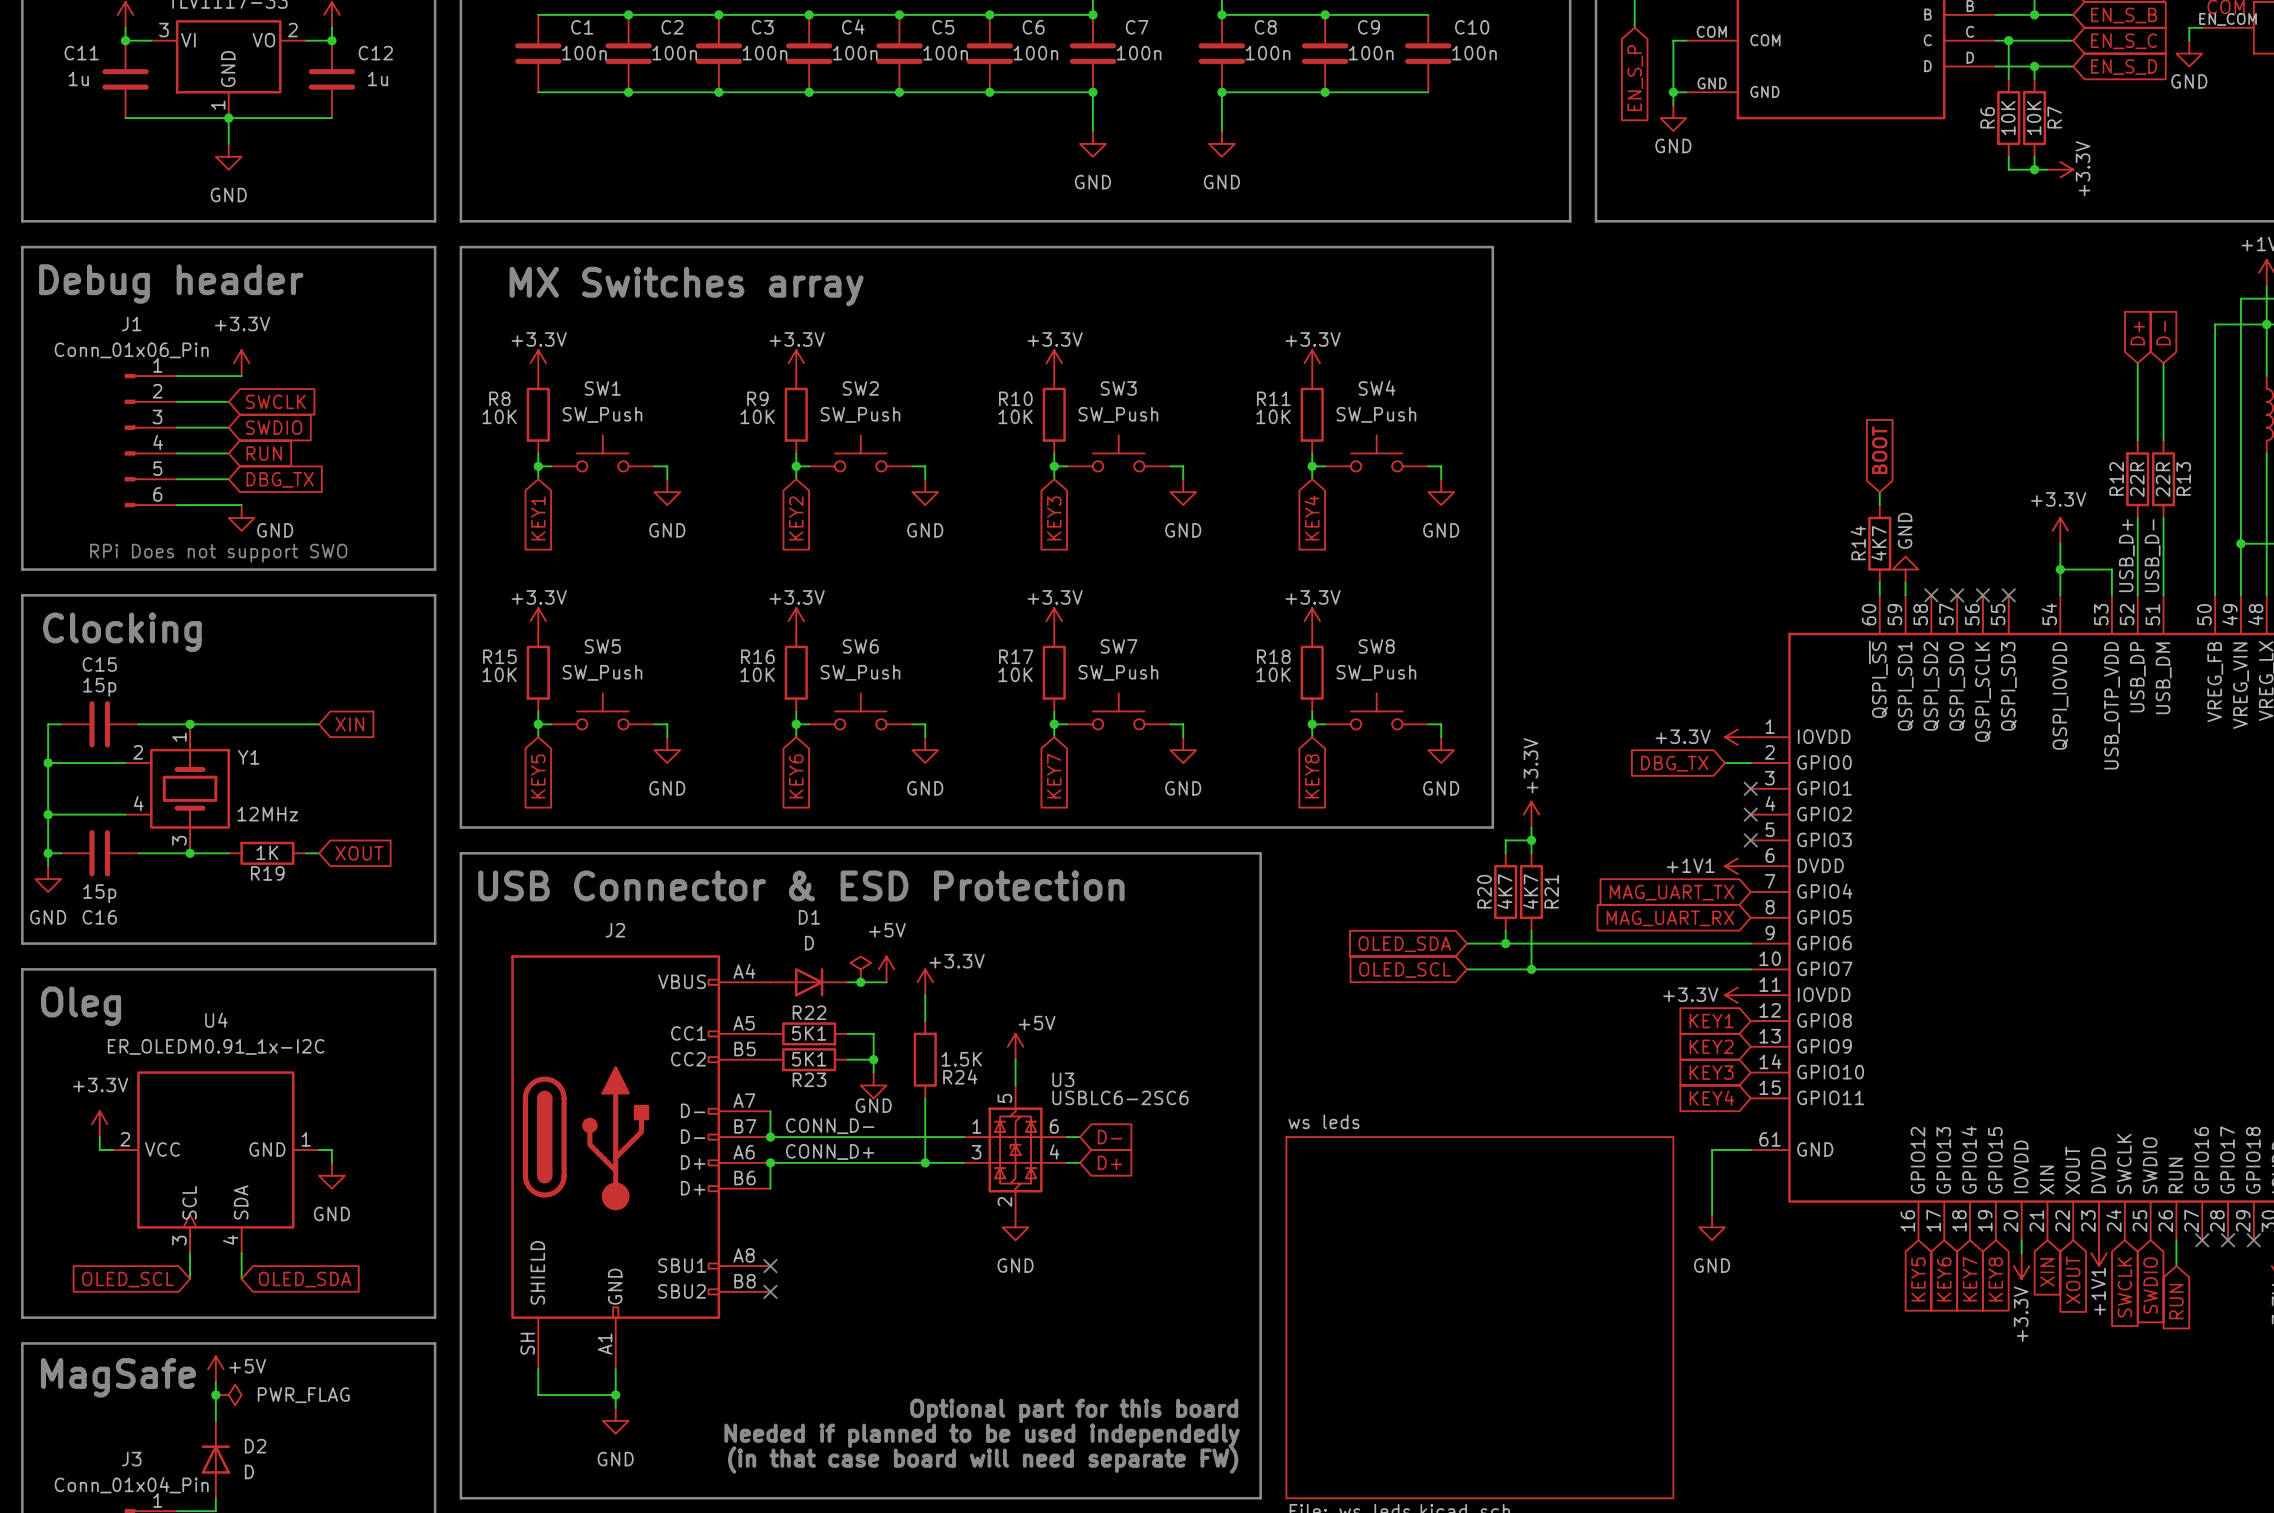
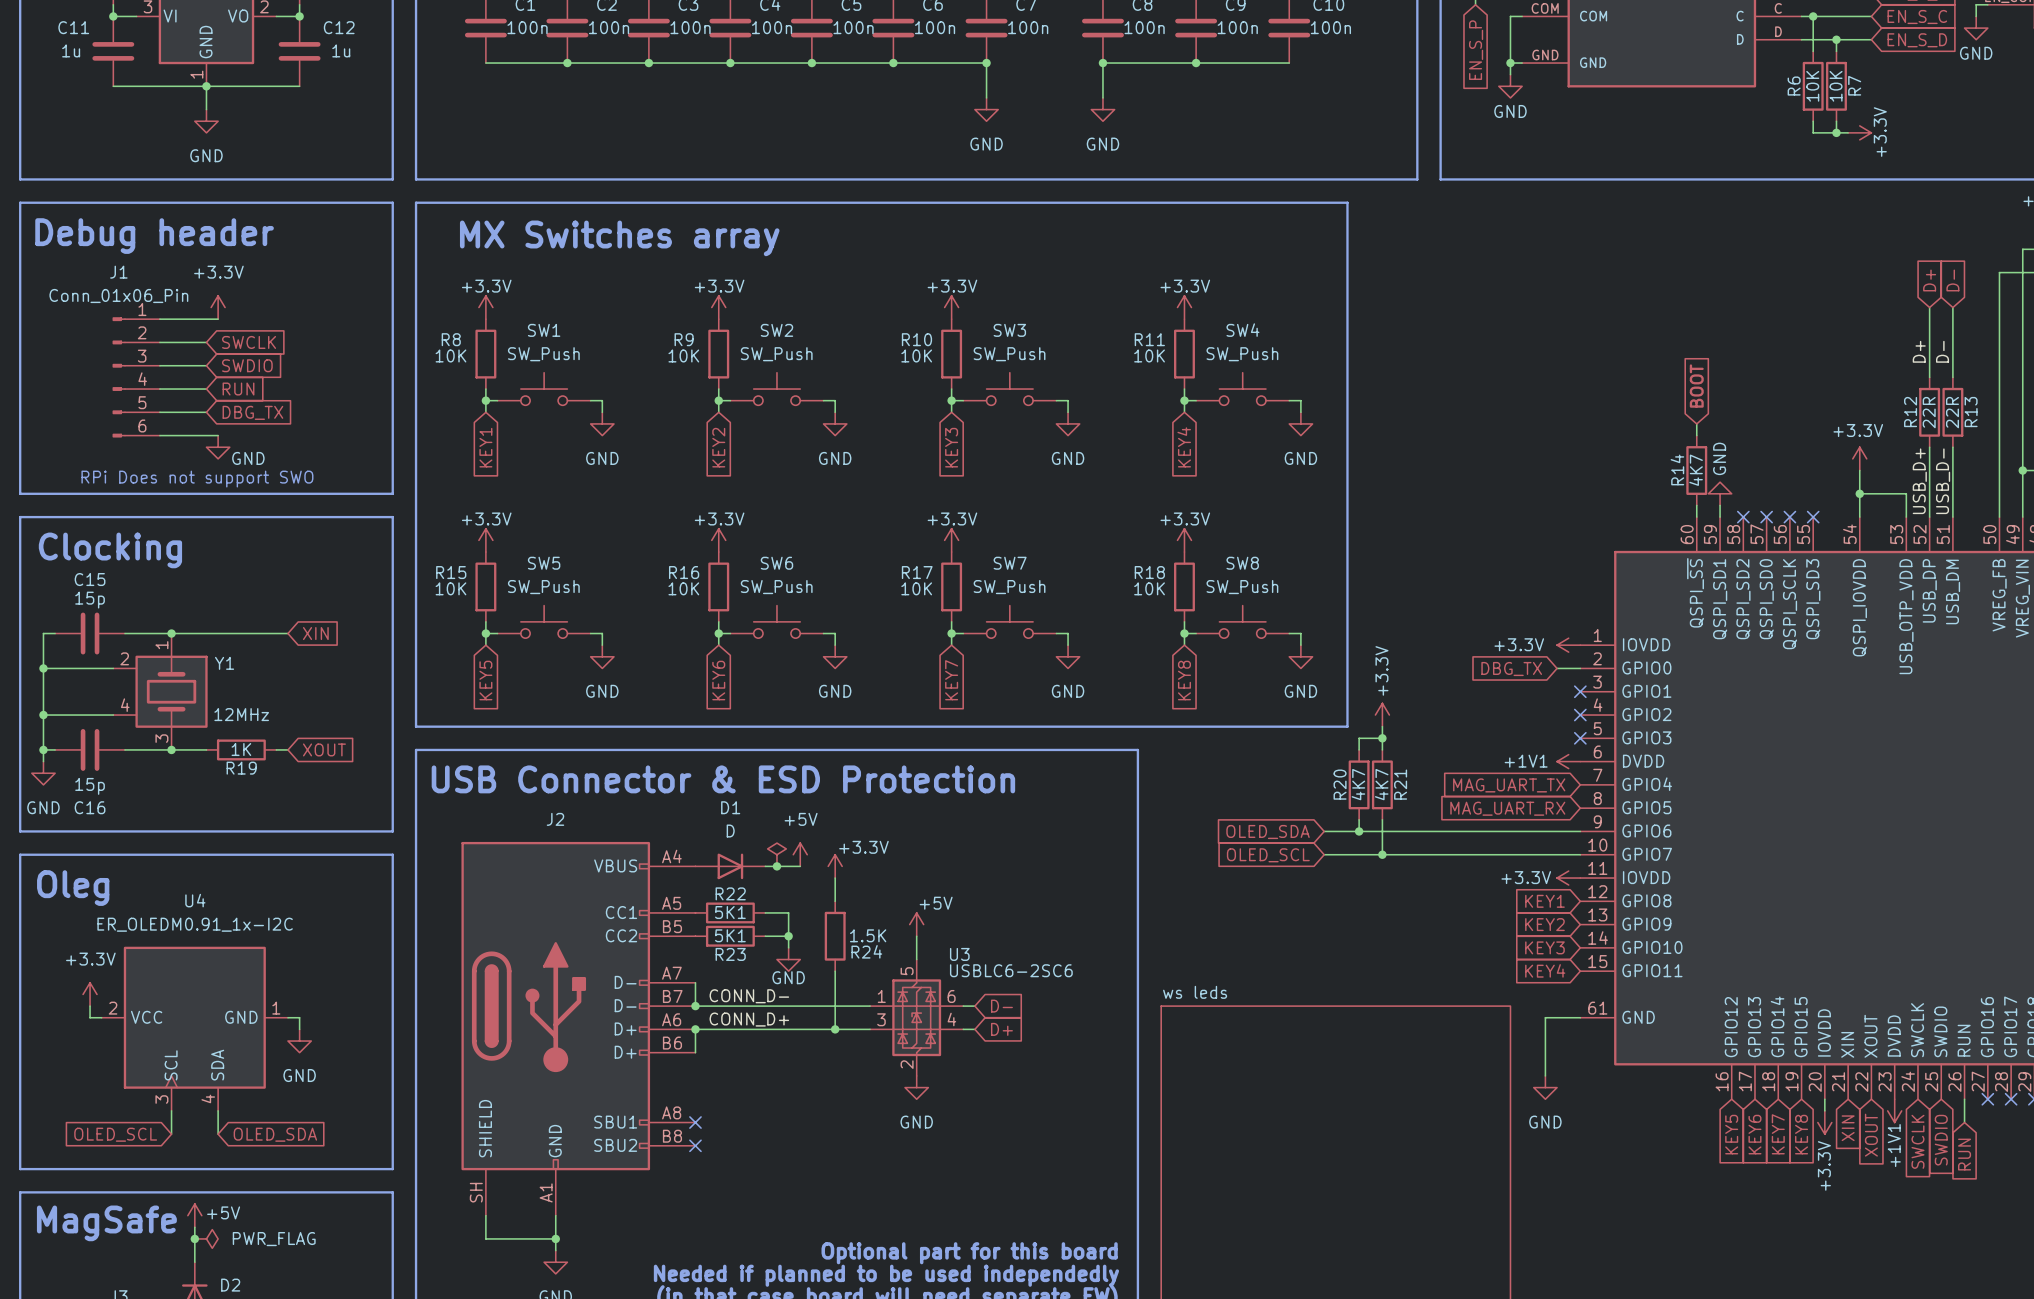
label: none -> D+ (1919, 351)
label: none -> D- (1942, 351)

